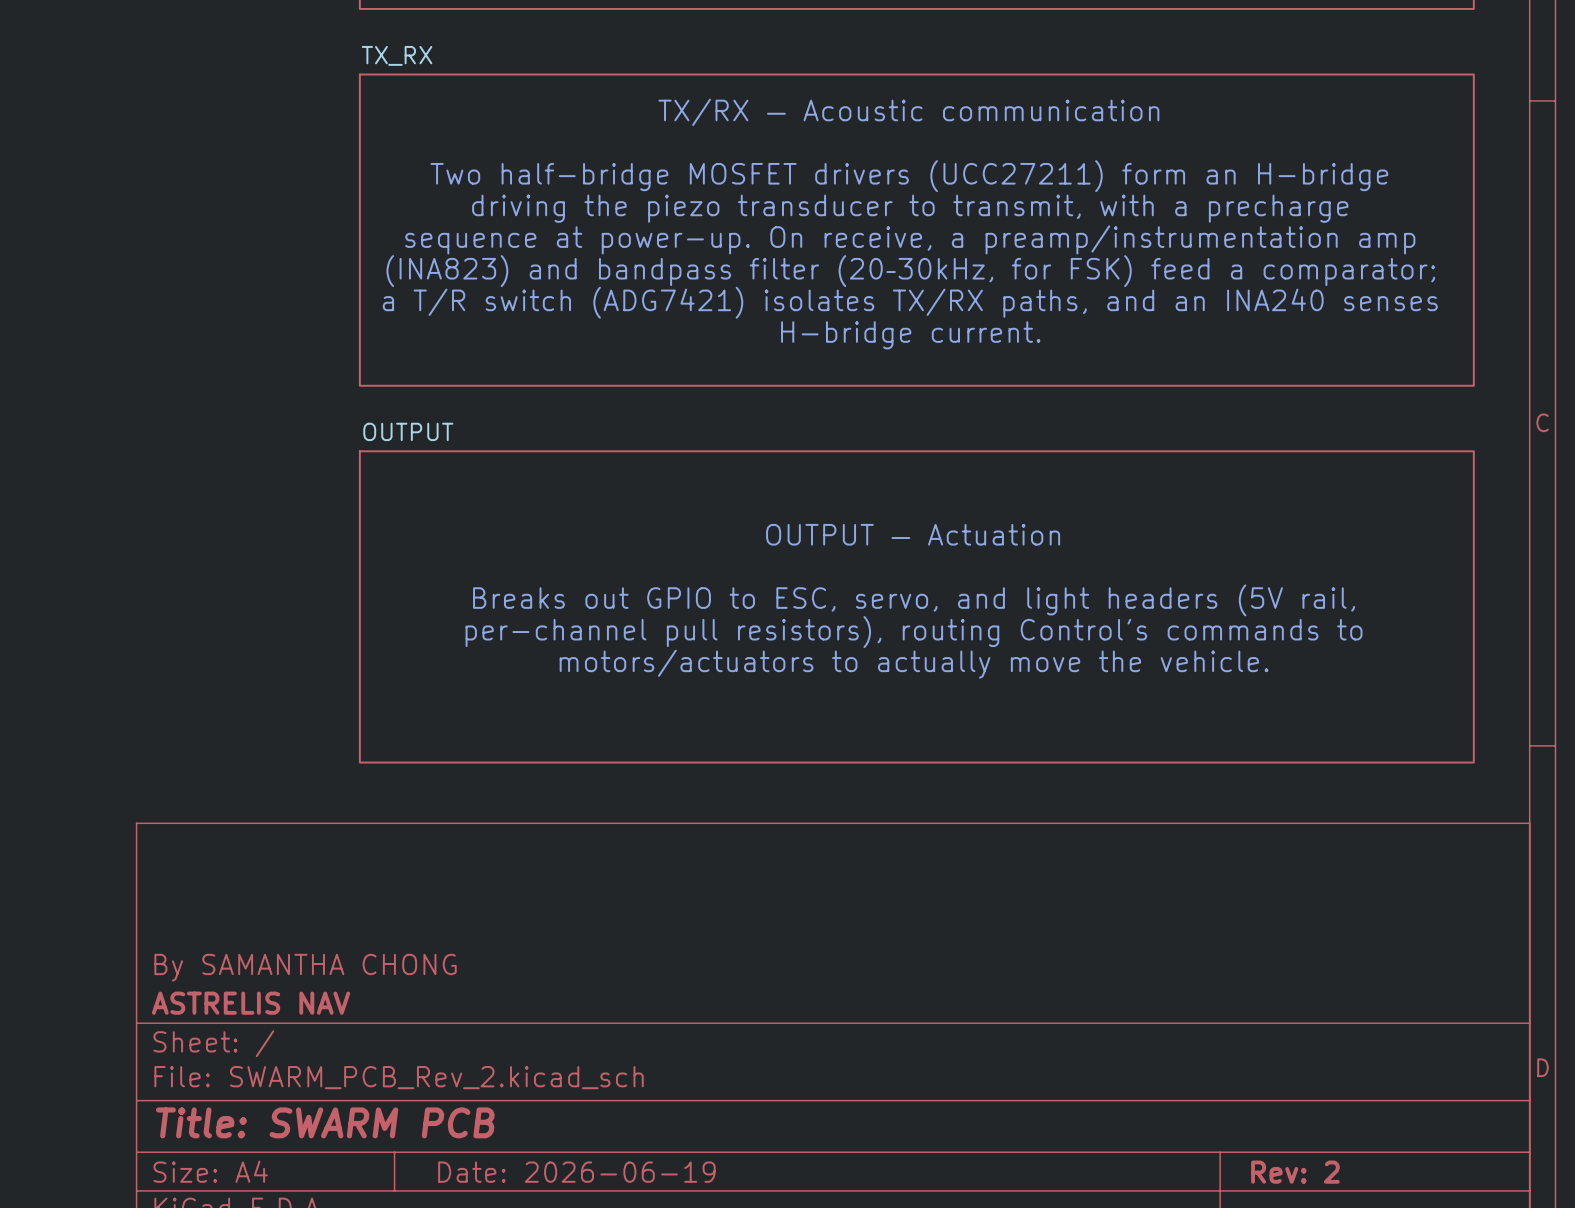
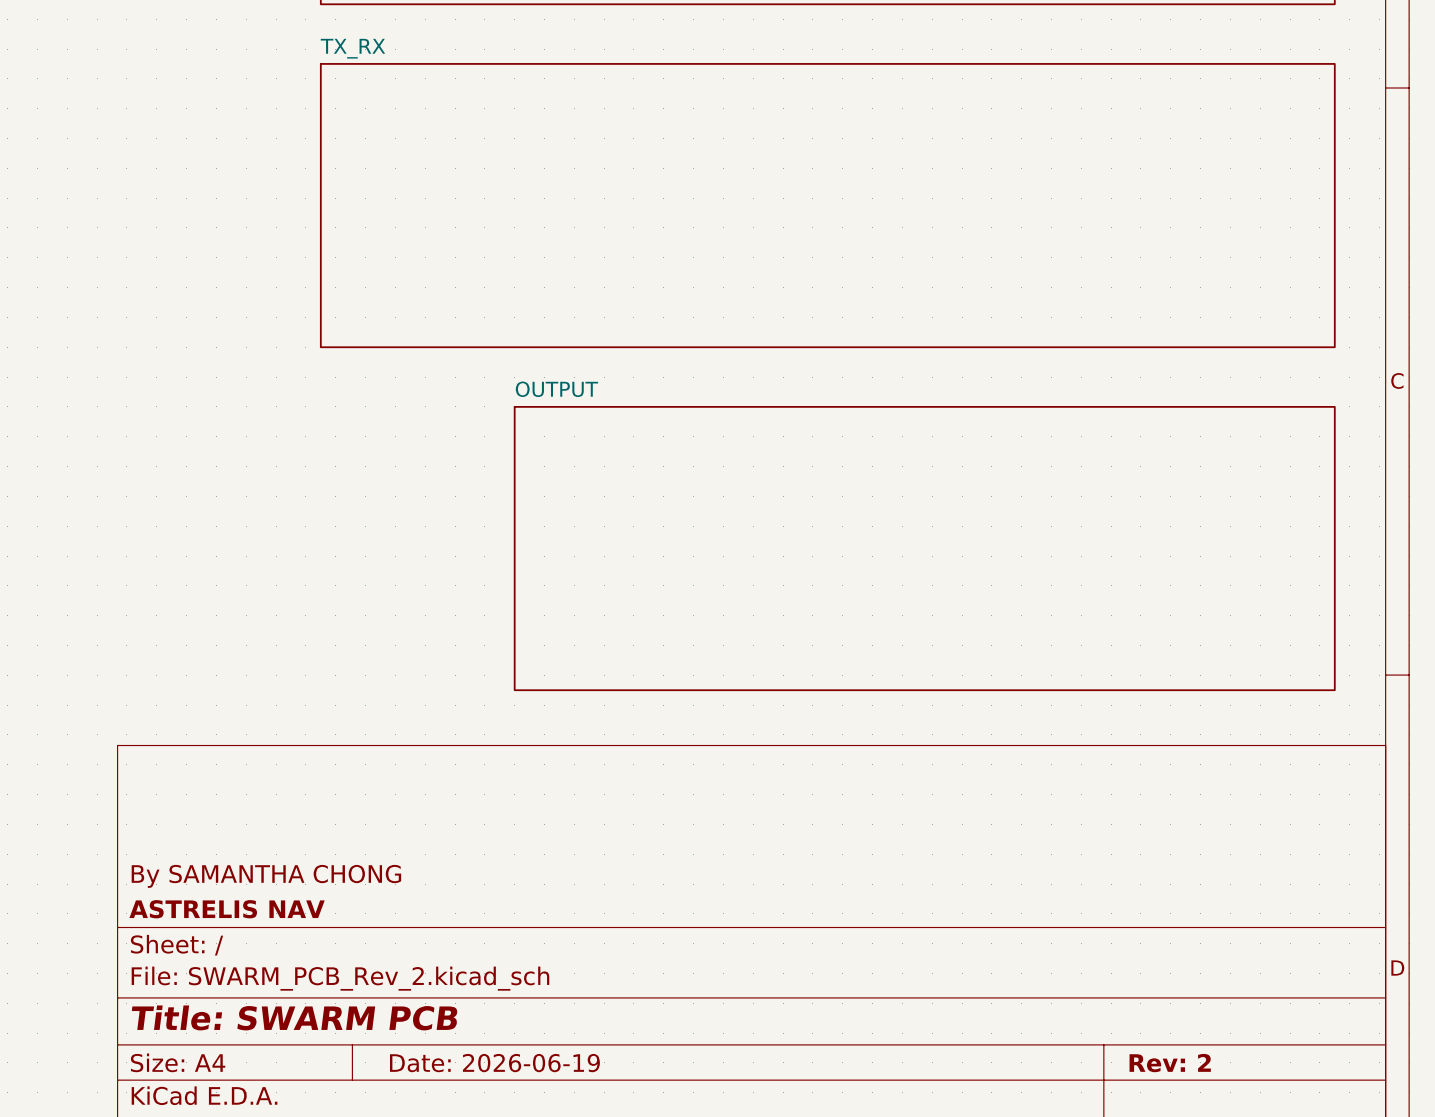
text: TX/RX — Acoustic communication (908, 112) -> none
text: Two half-bridge MOSFET drivers (UCC27211) form an H-bridge (909, 176) -> none
text: driving the piezo transducer to transmit, with a precharge (910, 208) -> none
text: sequence at power-up. On receive, a preamp/instrumentation amp (910, 239) -> none
text: (INA823) and bandpass filter (20–30kHz, for FSK) feed a comparator; (910, 271) -> none
text: a T/R switch (ADG7421) isolates TX/RX paths, and an INA240 senses (910, 302) -> none
text: H-bridge current. (910, 335) -> none
text: OUTPUT — Actuation (913, 534) -> none
text: Breaks out GPIO to ESC, servo, and light headers (5V rail, (914, 600) -> none
sheet OUTPUT: (916, 606) -> none
sheet OUTPUT: none -> (924, 548)
text: per-channel pull resistors), routing Control's commands to (914, 632) -> none
text: motors/actuators to actually move the vehicle. (914, 664) -> none

